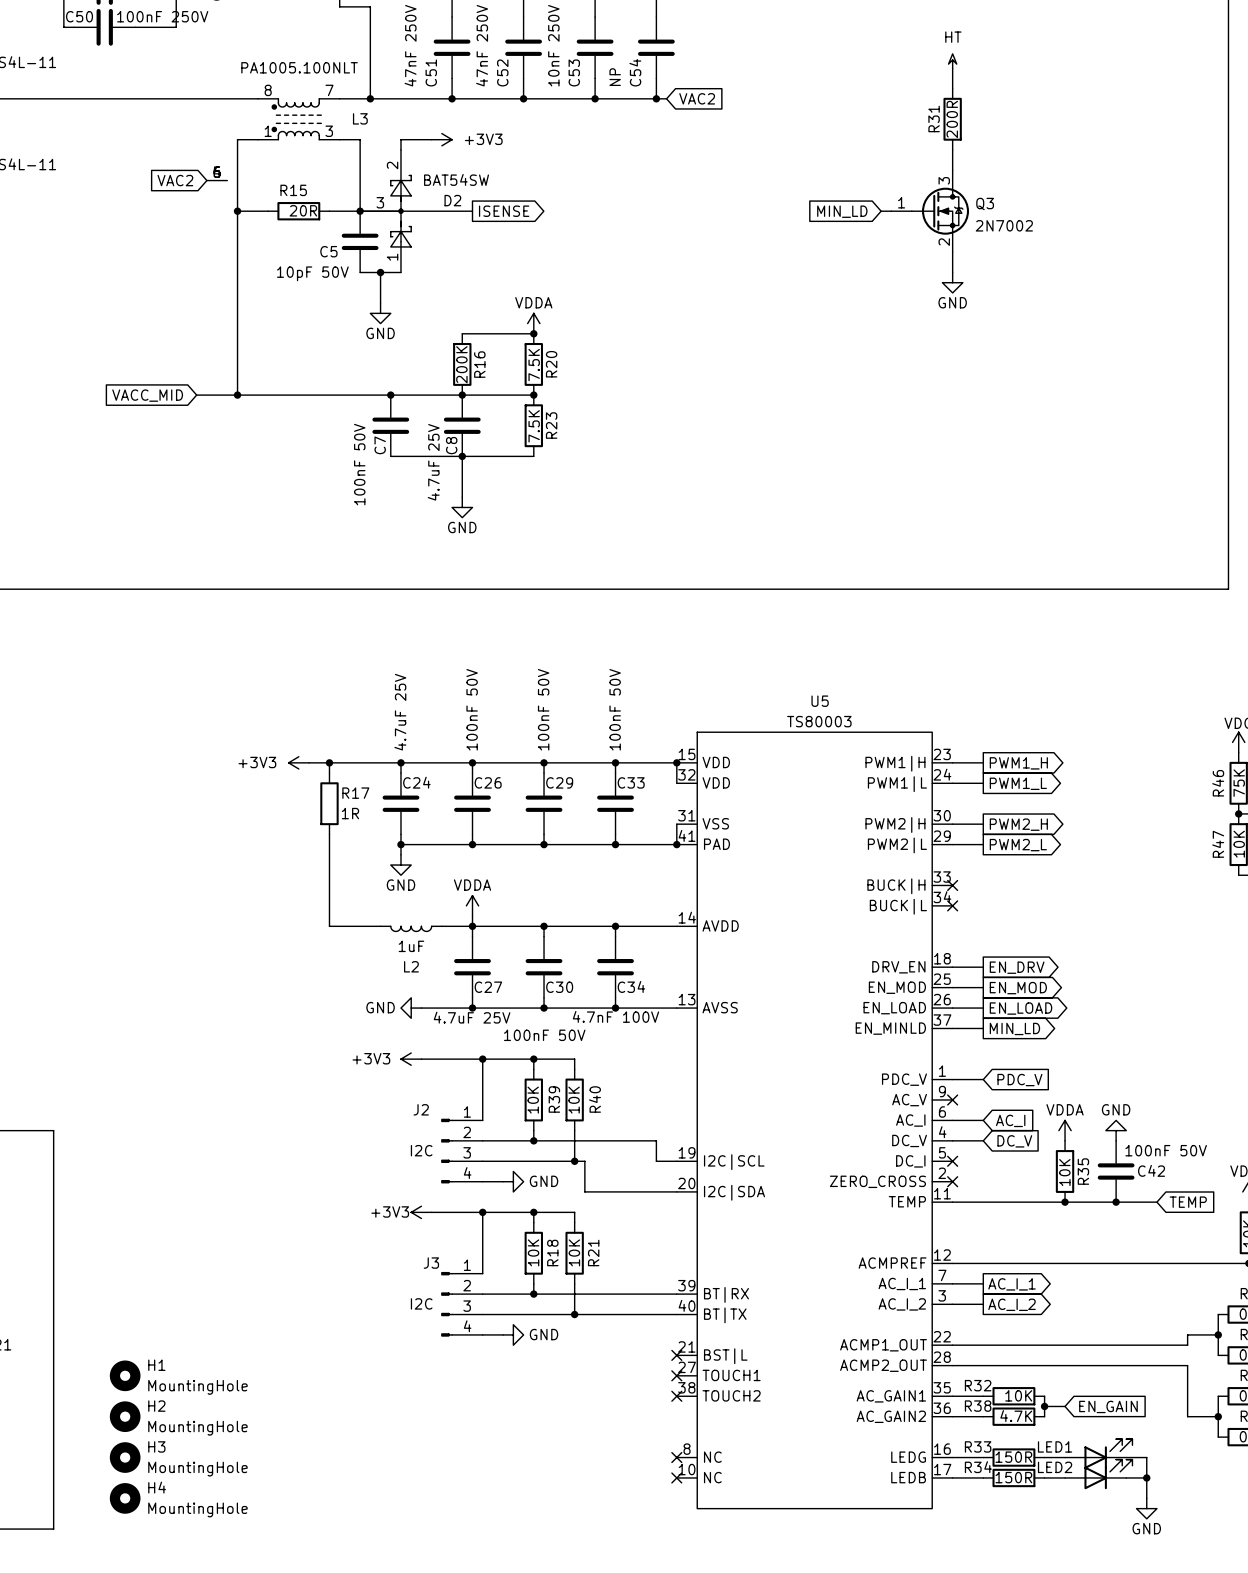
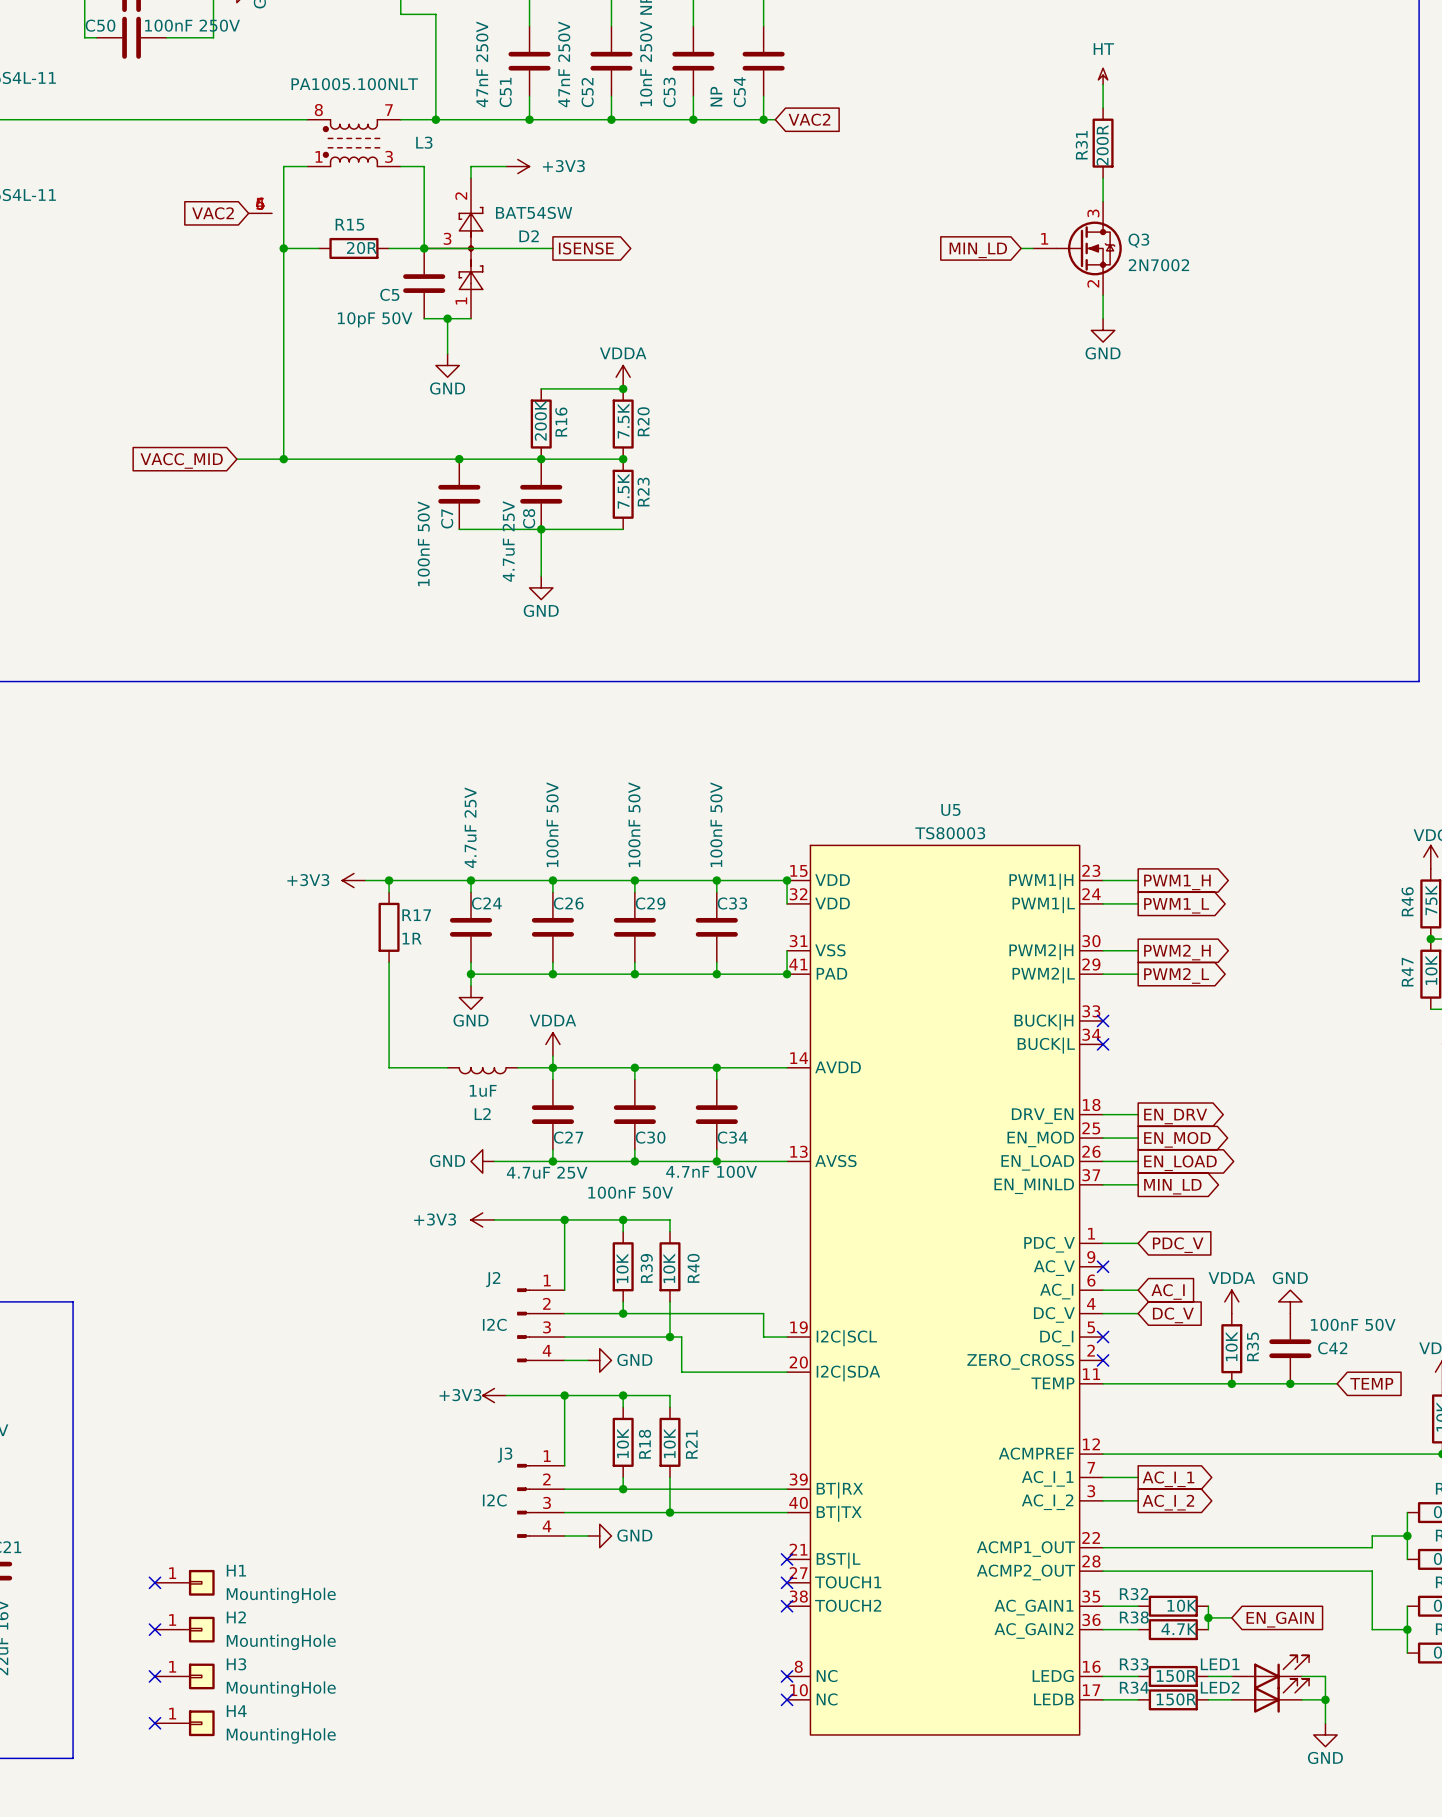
H1 symbol: [109, 1360, 141, 1392] -> [154, 1569, 215, 1596]
no-connect mark: none -> (154, 1582)
H2 symbol: [109, 1401, 141, 1433] -> [154, 1616, 215, 1643]
no-connect mark: none -> (154, 1629)
H3 symbol: [109, 1442, 141, 1473] -> [154, 1663, 215, 1690]
no-connect mark: none -> (154, 1676)
H4 symbol: [109, 1483, 141, 1514] -> [154, 1710, 215, 1737]
no-connect mark: none -> (154, 1723)

